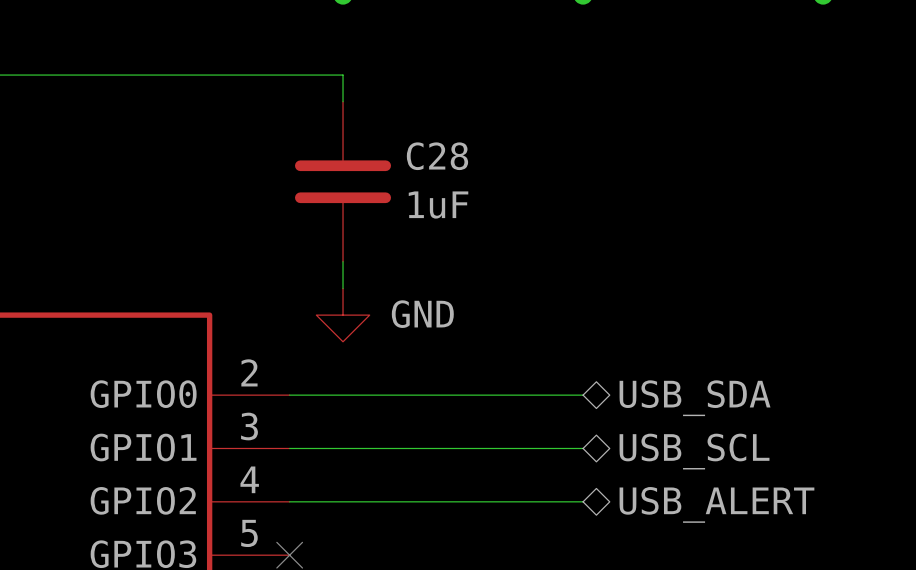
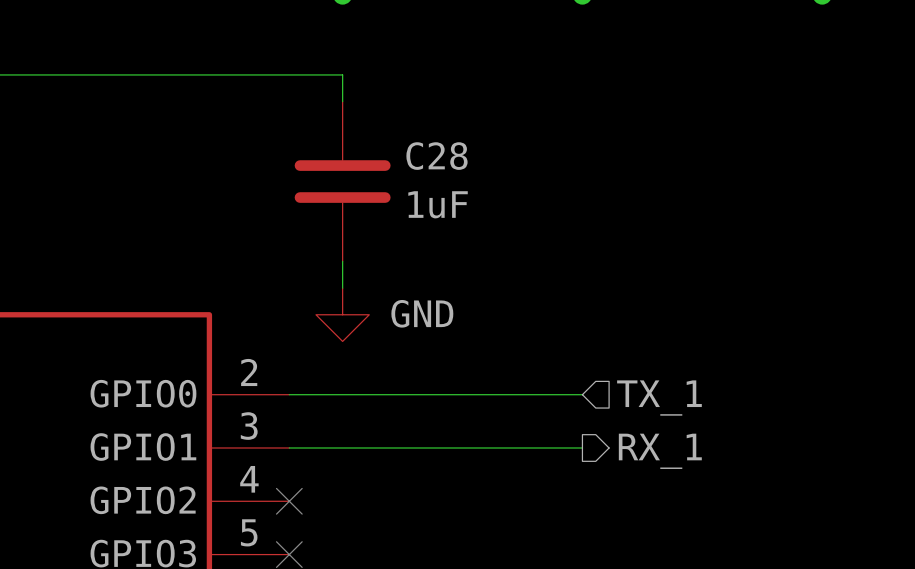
hierarchical label shape: bidirectional (695, 398) -> input (659, 398)
hierarchical label: USB_SDA (695, 398) -> TX_1 (659, 398)
hierarchical label shape: bidirectional (694, 451) -> output (660, 451)
hierarchical label: USB_SCL (694, 451) -> RX_1 (660, 451)
wire: (289, 501) (583, 501) -> none
no-connect mark: none -> (289, 501)
hierarchical label: USB_ALERT (716, 504) -> none

